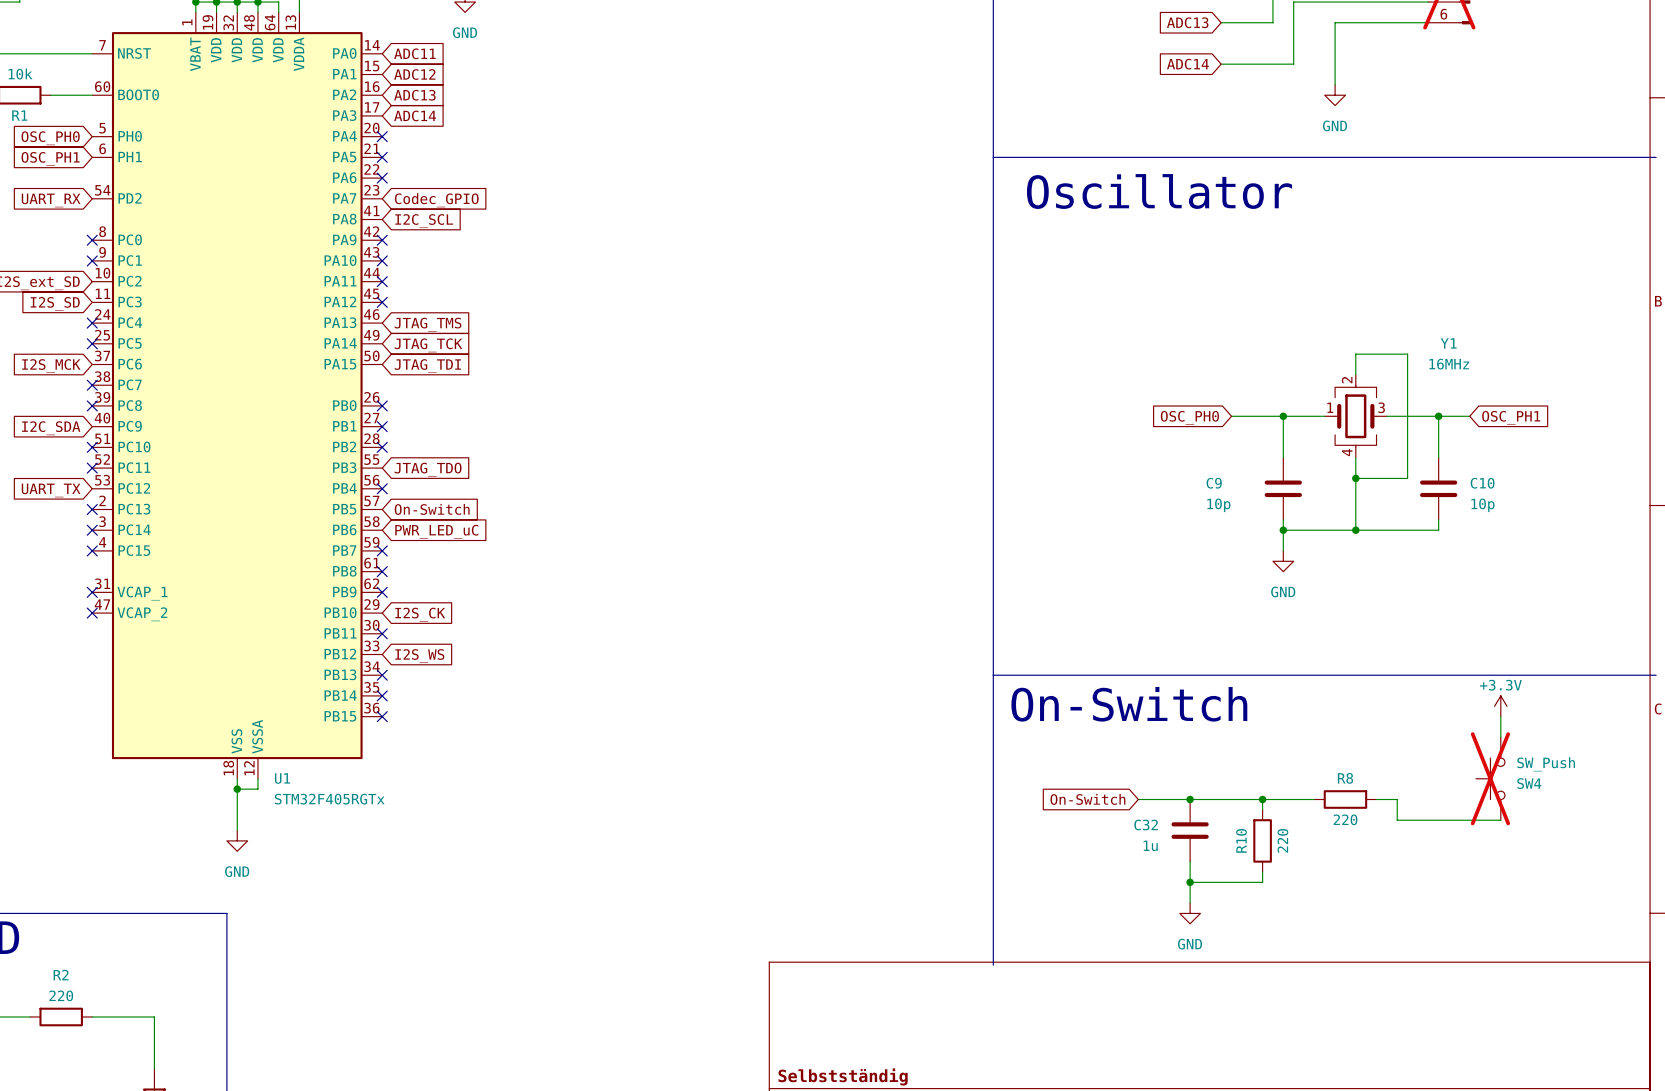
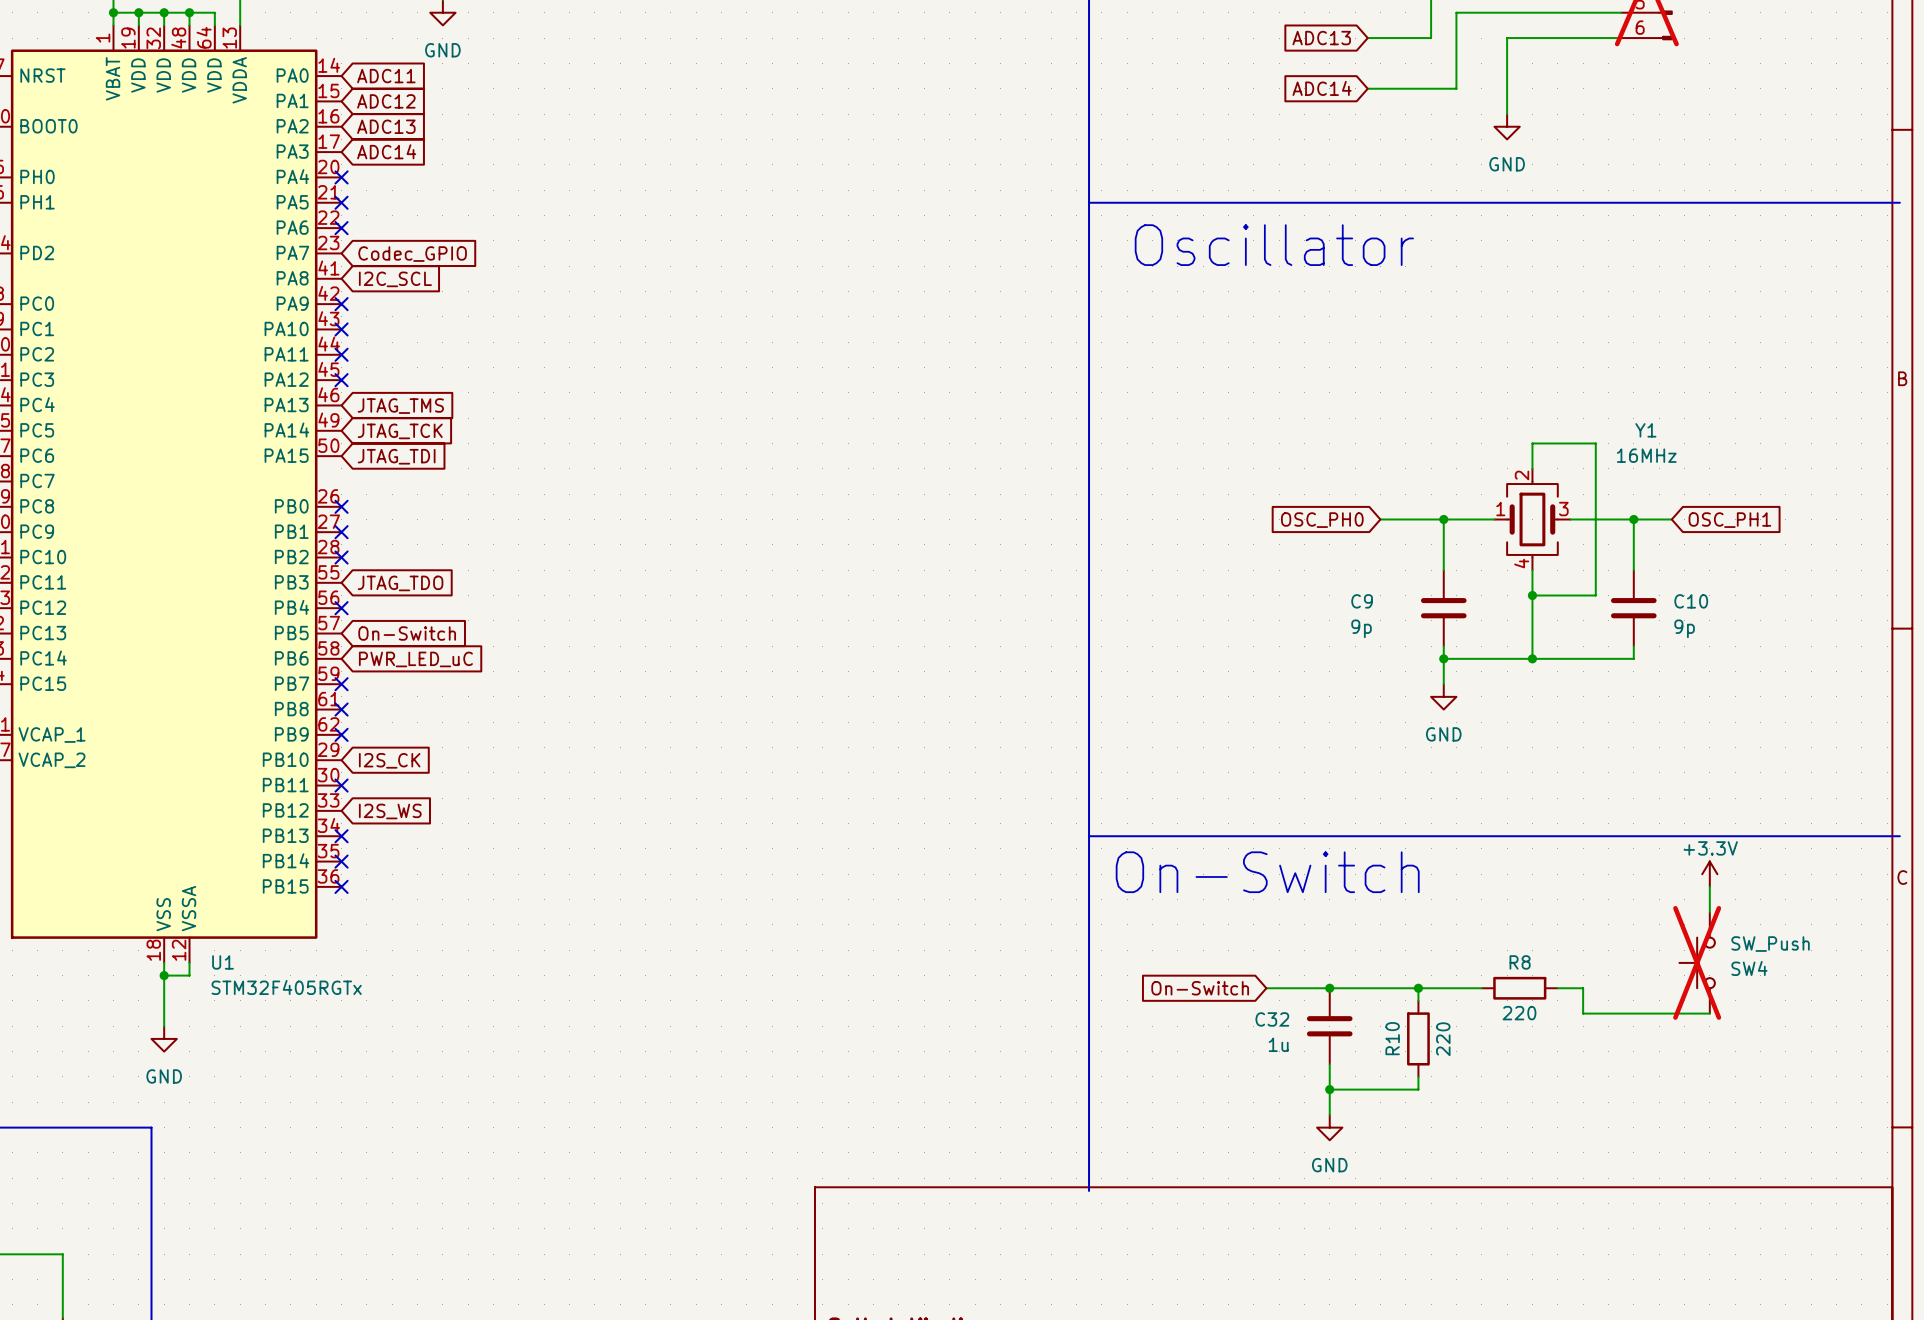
C9 value: 10p (1218, 505) -> 9p (1361, 628)
C10 value: 10p (1482, 505) -> 9p (1684, 628)

